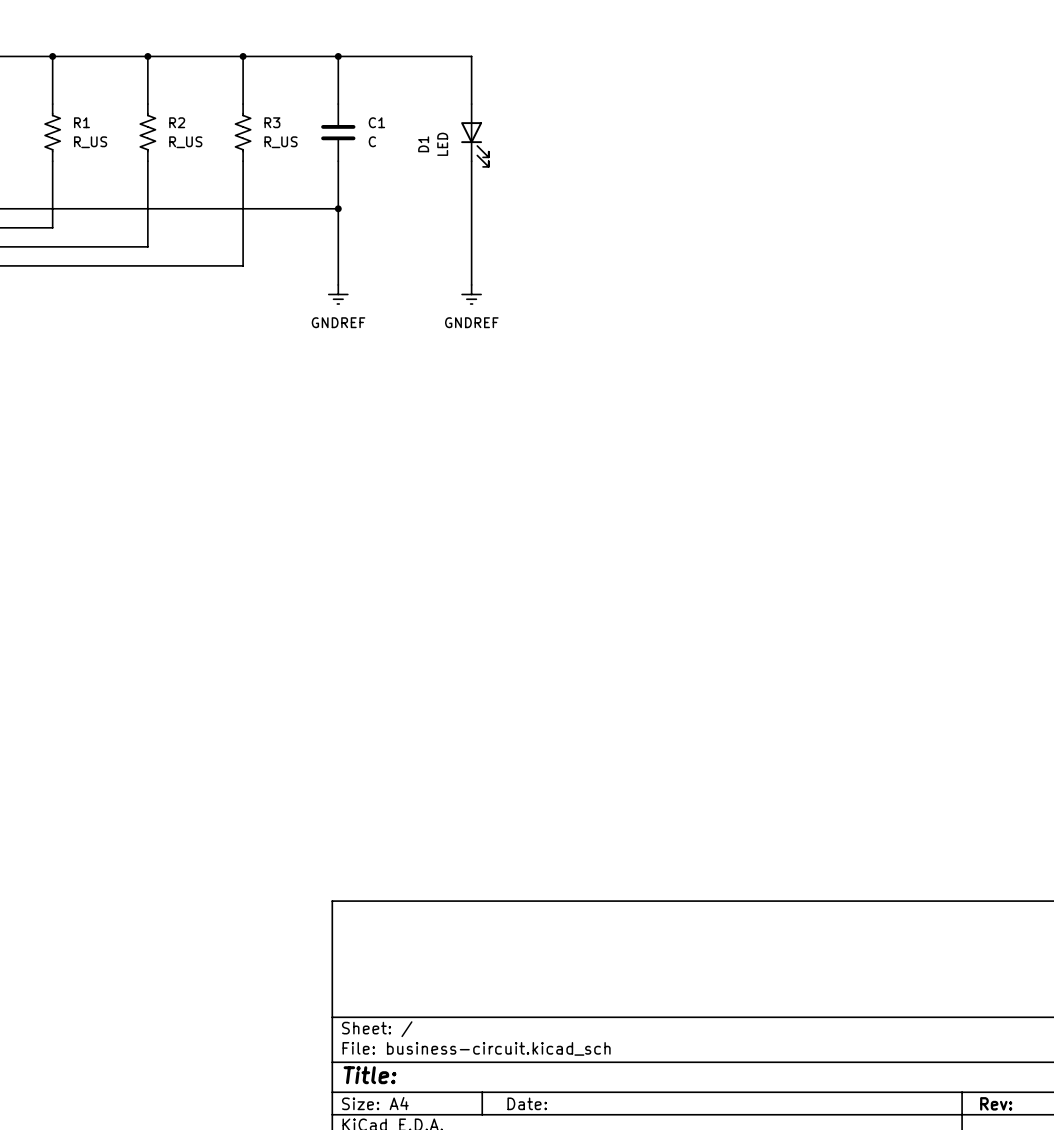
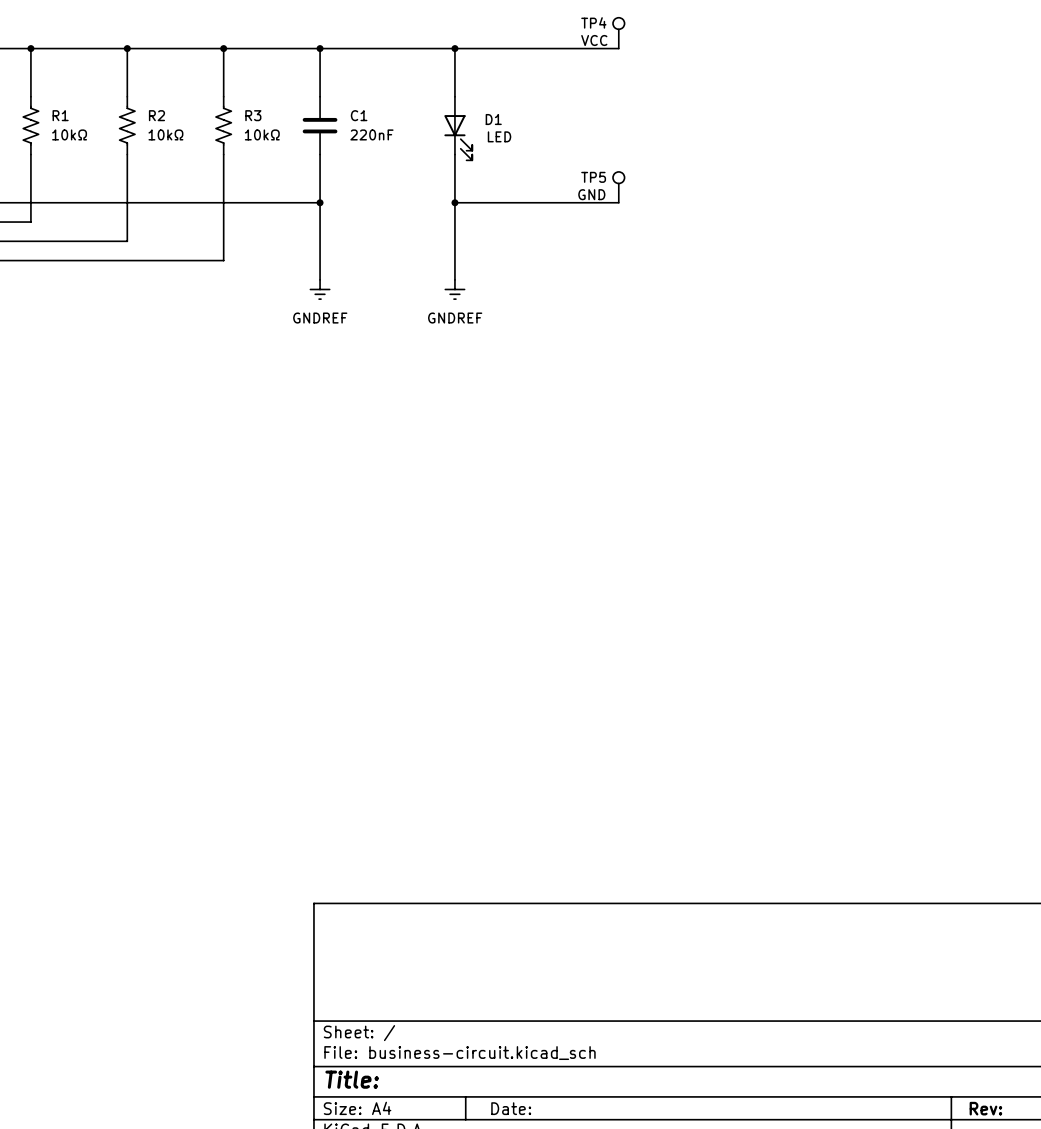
TP4: none -> VCC (618, 33)
wire: none -> (454, 48) (618, 48)
junction: none -> (454, 48)
C1 value: C (372, 141) -> 220nF (371, 134)
R1 value: R_US (90, 142) -> 10kΩ (69, 134)
R2 value: R_US (185, 142) -> 10kΩ (165, 134)
R3 value: R_US (281, 142) -> 10kΩ (262, 134)
D1 name rotation: 0° (423, 144) -> 90° clockwise (493, 119)
D1 name position: D1 (423, 144) -> D1 (493, 119)
D1 value rotation: 0° (442, 144) -> 90° clockwise (499, 136)
D1 value position: LED (442, 144) -> LED (499, 136)
TP5: none -> GND (618, 187)
wire: none -> (454, 202) (618, 202)
junction: none -> (454, 202)

